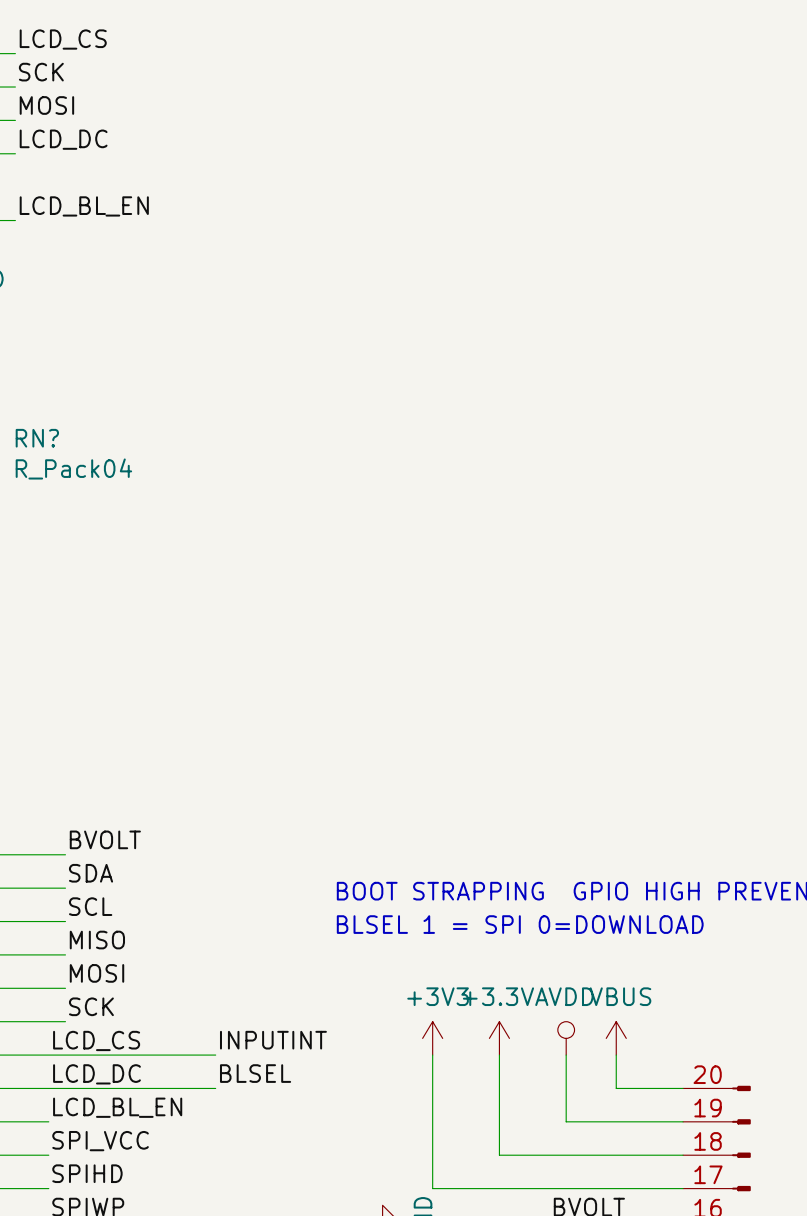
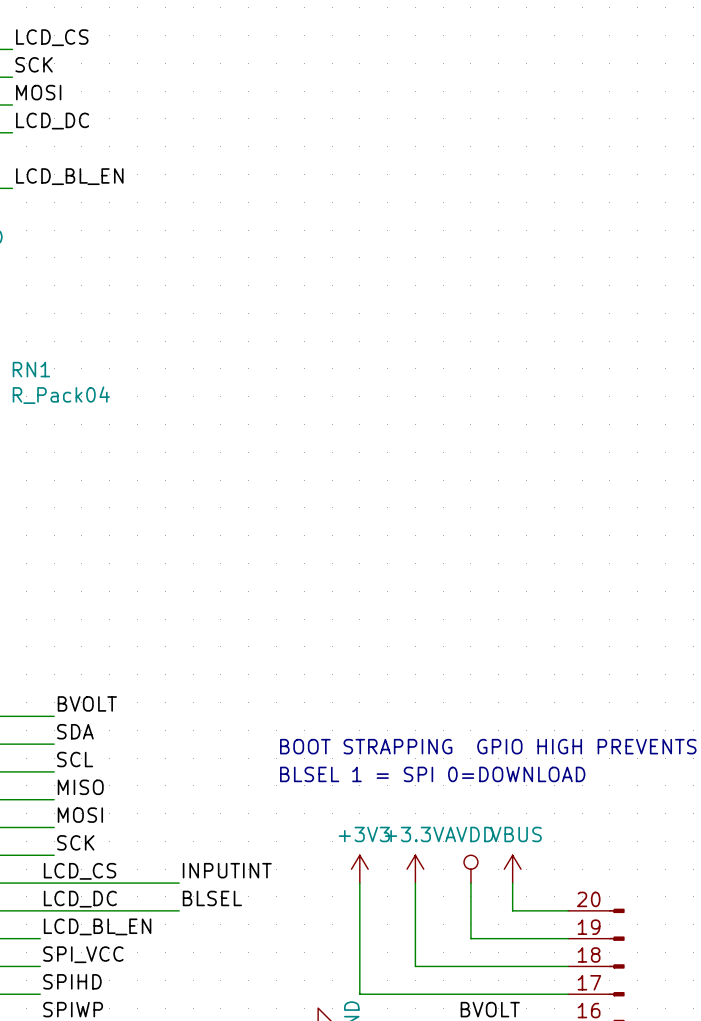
RN? name: RN? (37, 438) -> RN1 (31, 369)

